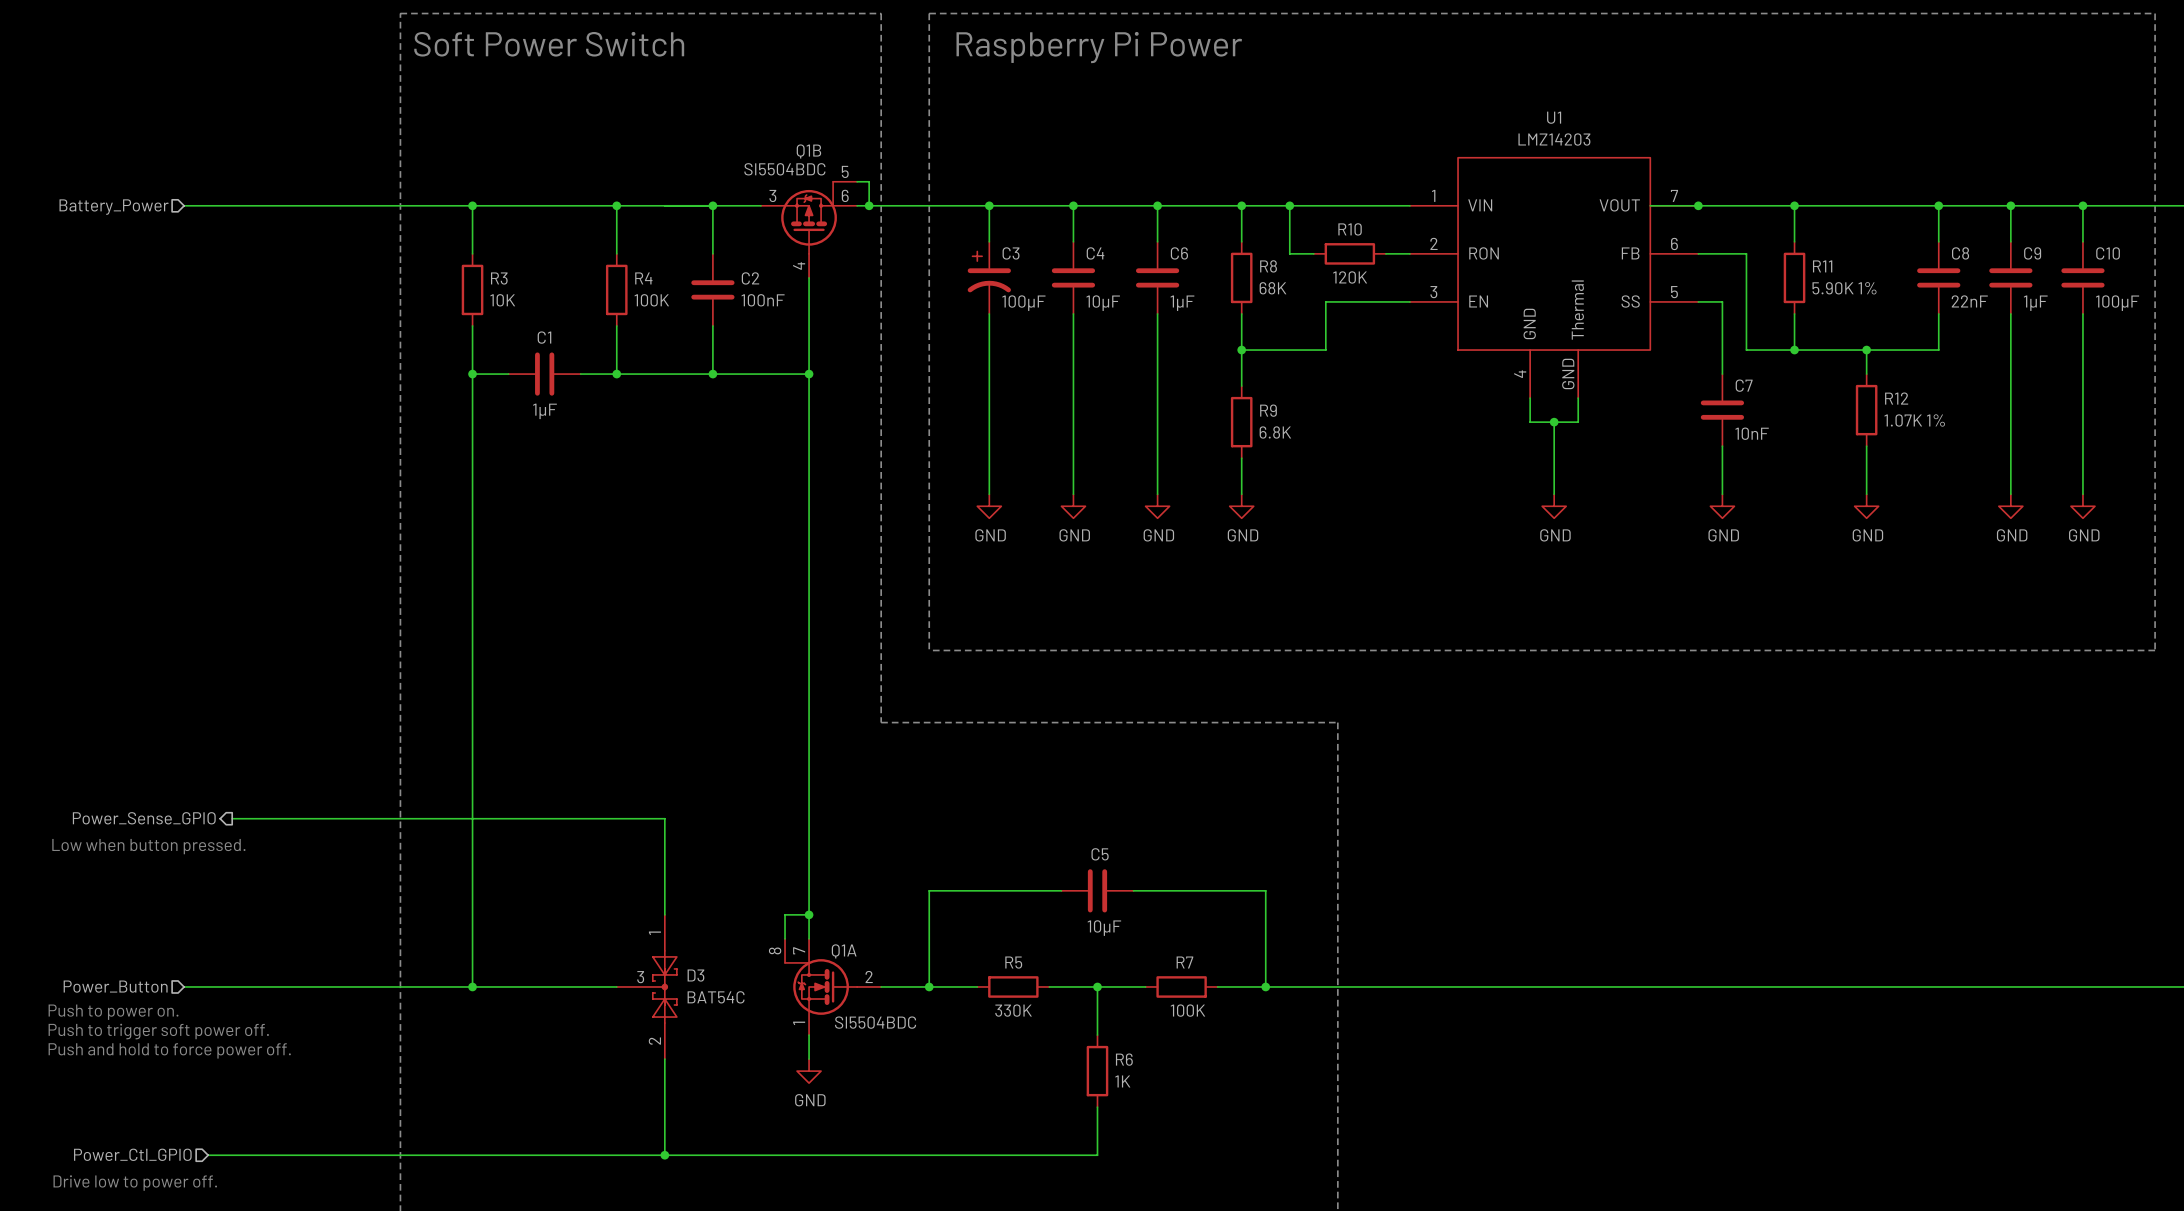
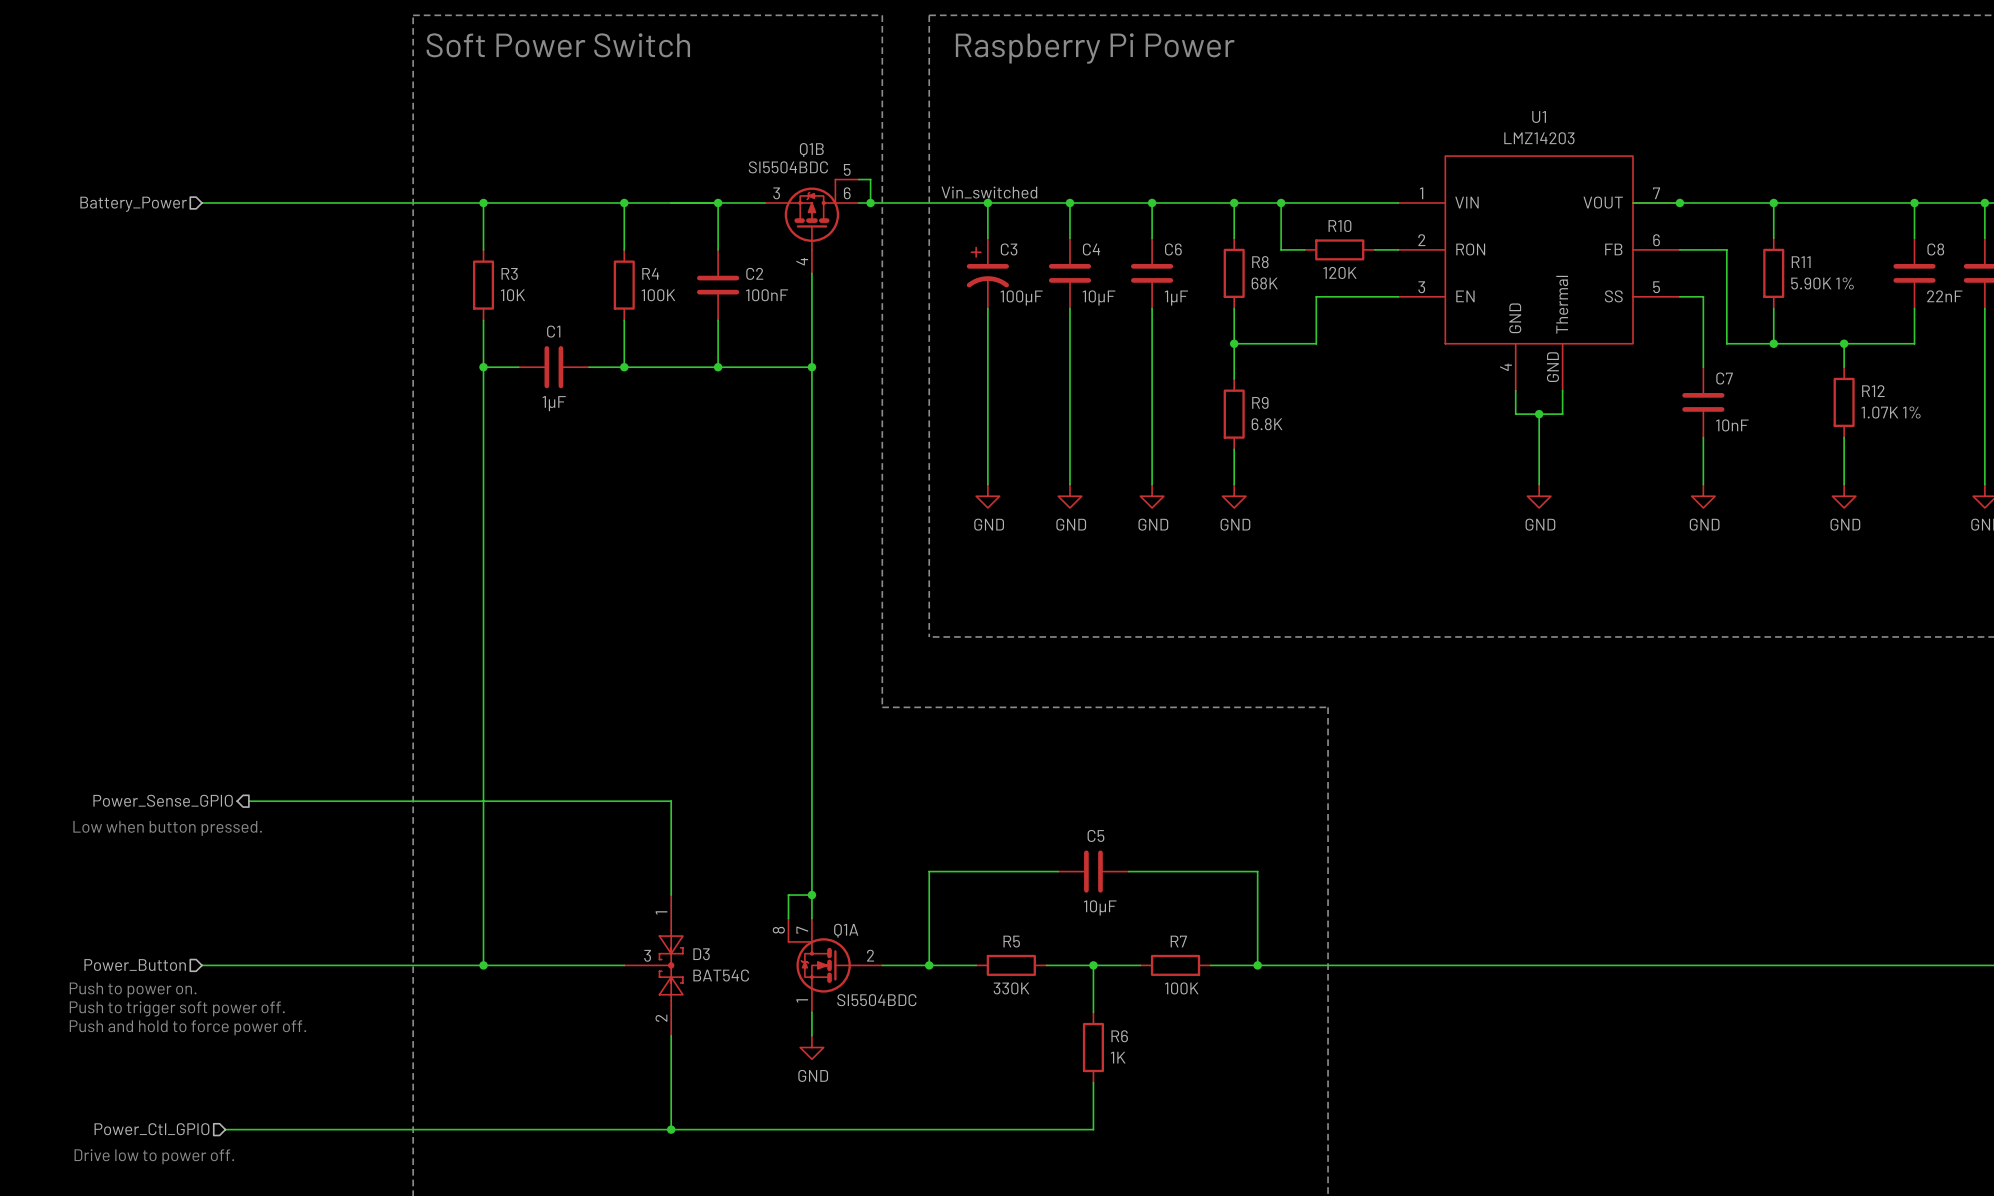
label: none -> Vin_switched (989, 192)

